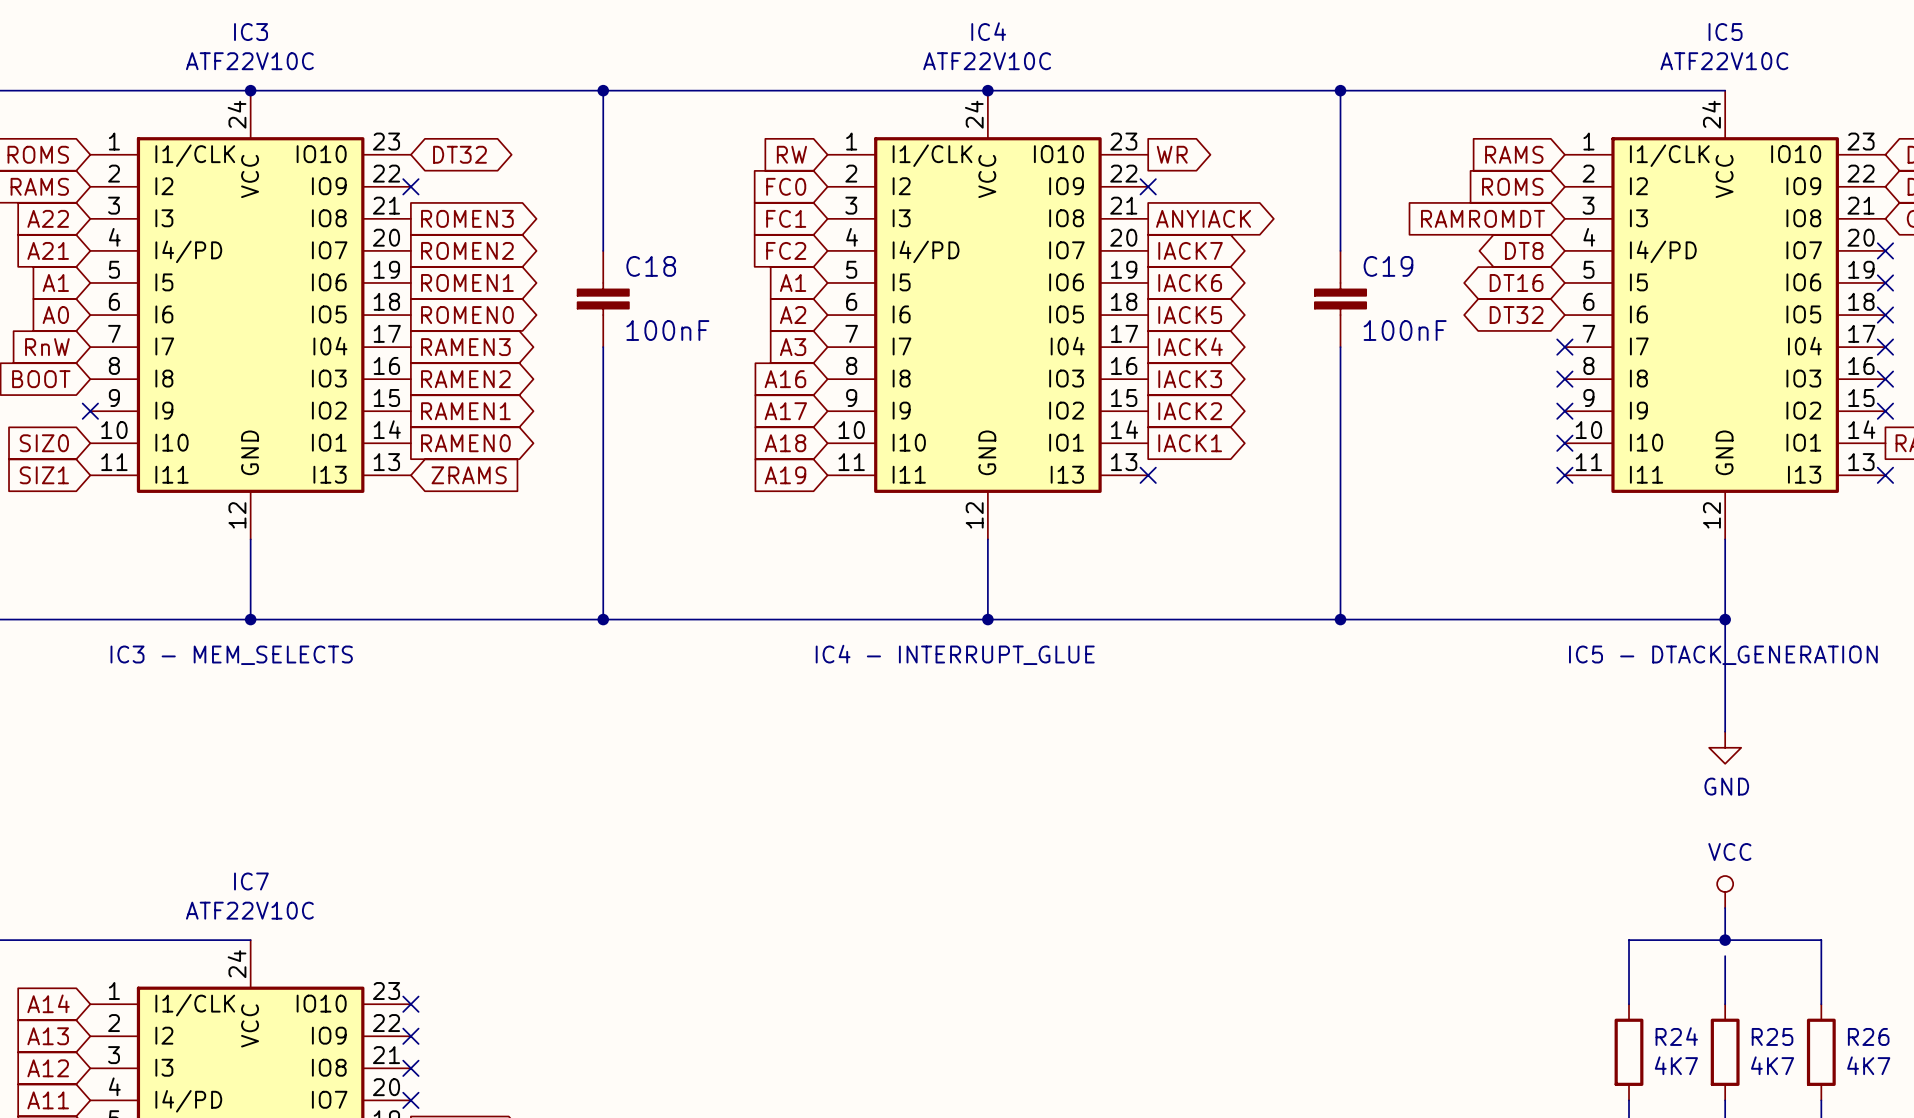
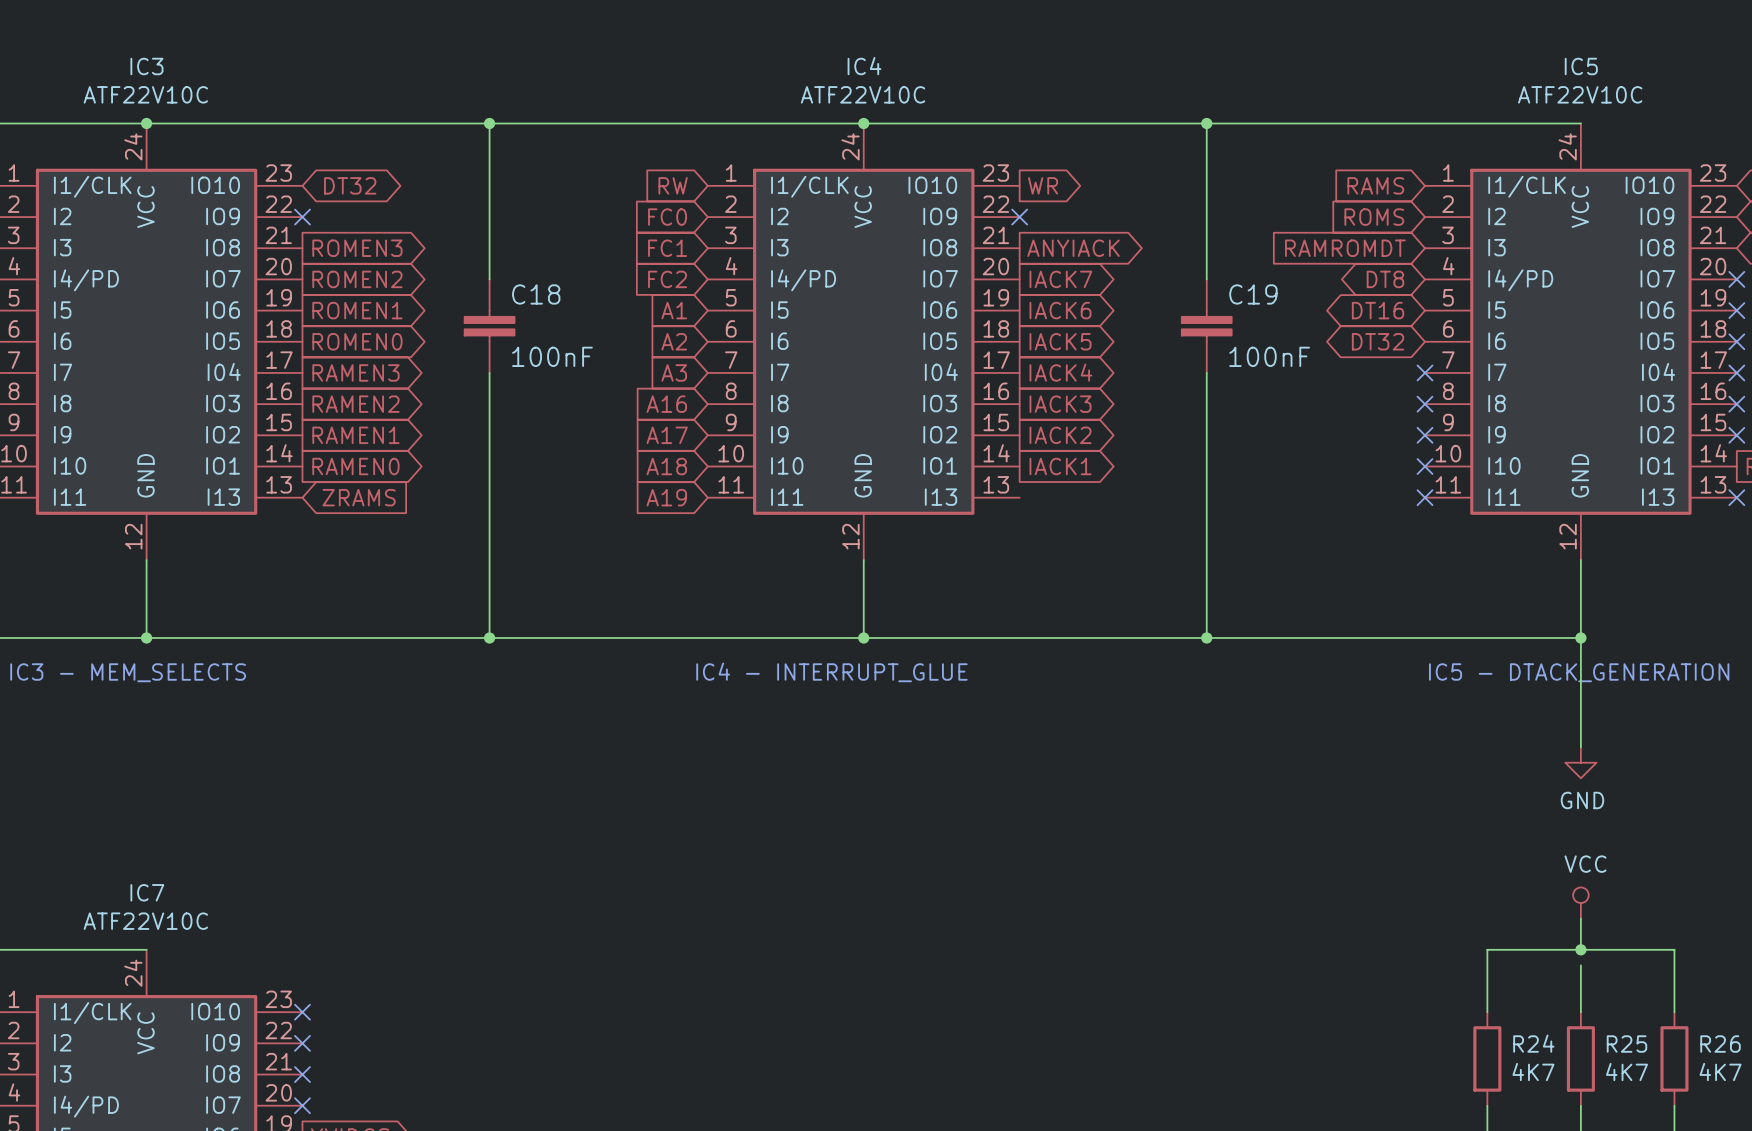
no-connect mark: (1148, 475) -> none

